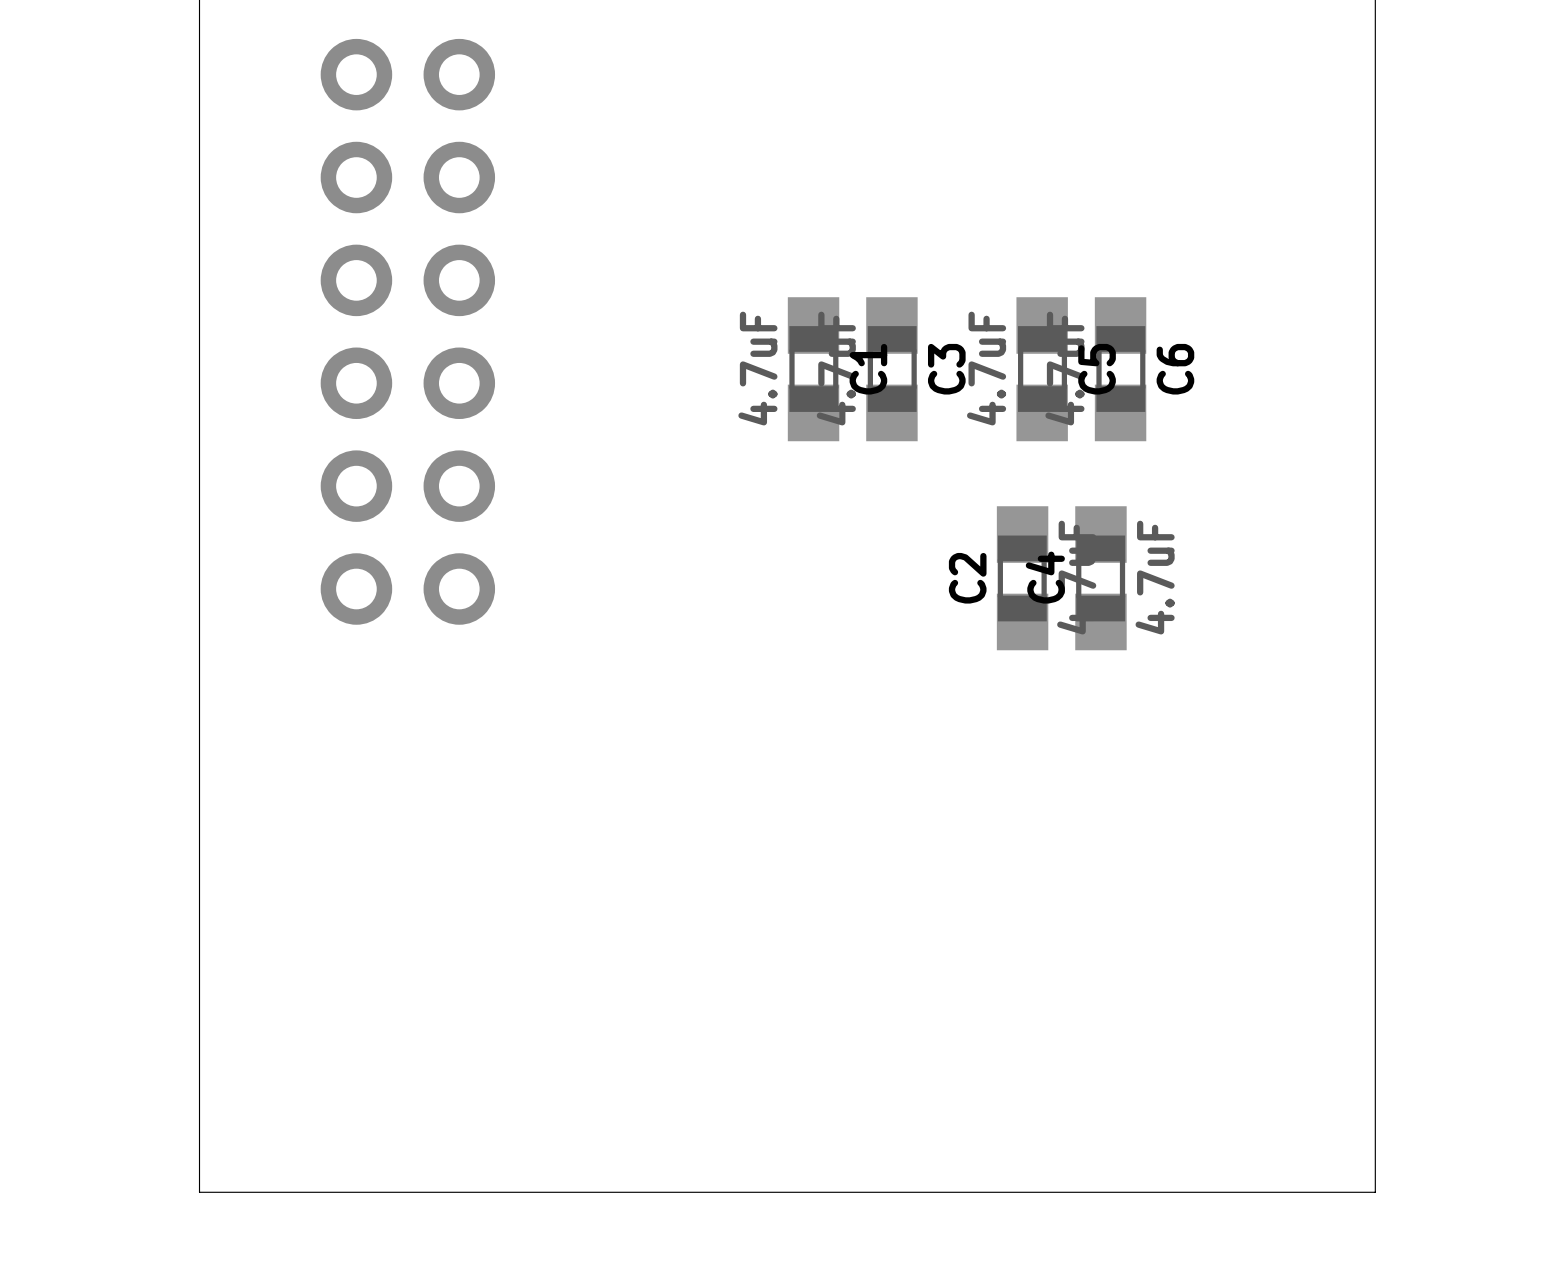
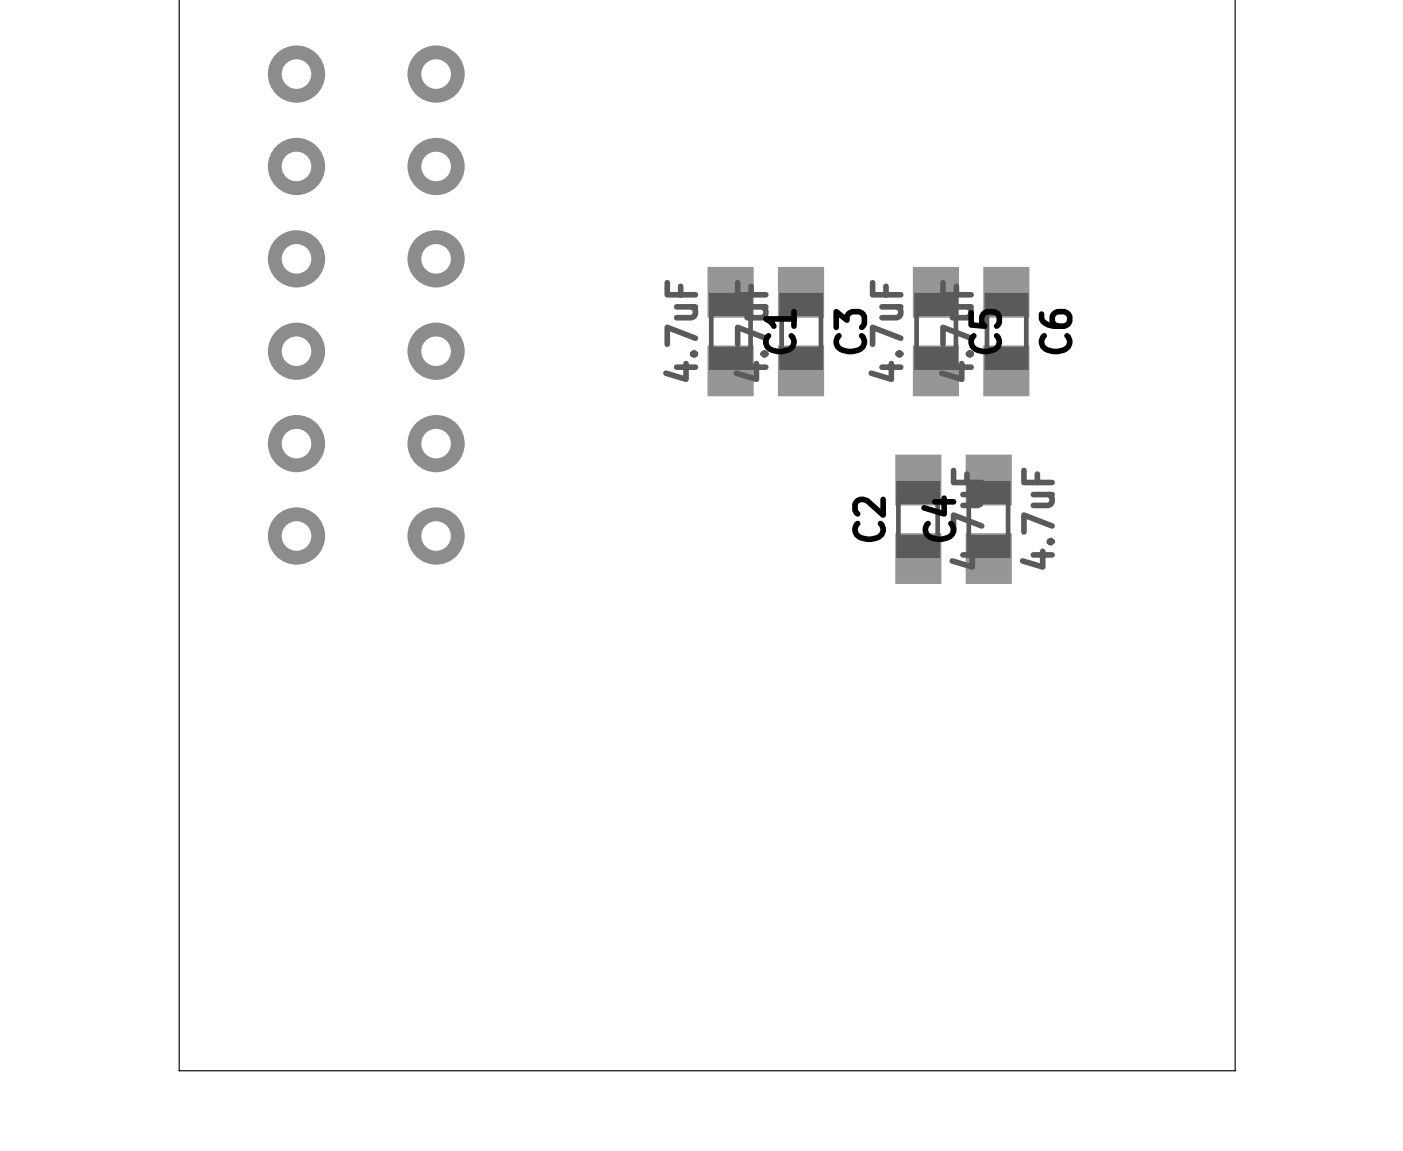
part footprint: [320, 38, 496, 625] -> [267, 45, 465, 565]

